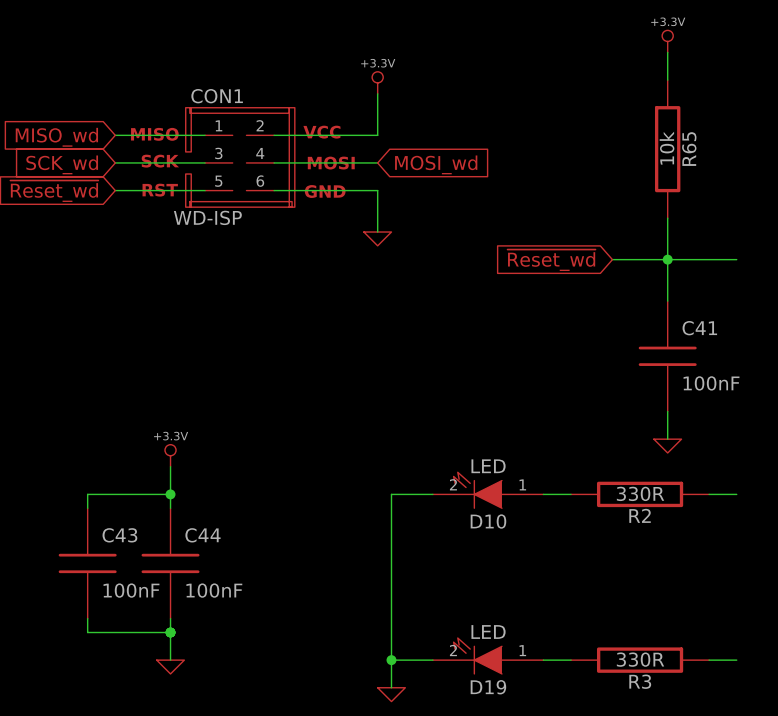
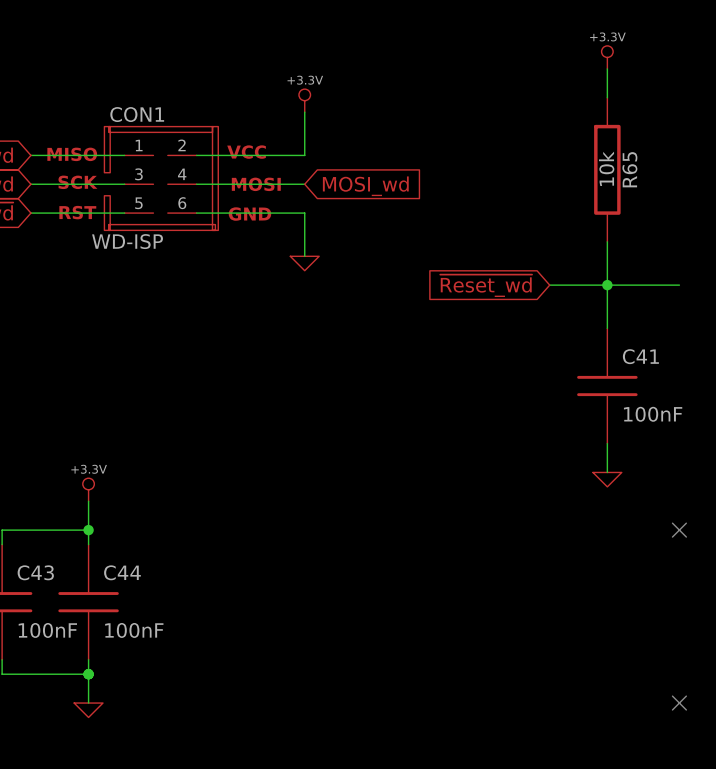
D10: LED (488, 490) -> none
wire: (432, 494) (391, 494) (391, 687) -> none
wire: (543, 494) (571, 494) -> none
R2: 330R (640, 494) -> none
wire: (709, 494) (736, 494) -> none
no-connect mark: none -> (679, 530)
D19: LED (488, 655) -> none
wire: (391, 660) (432, 660) -> none
junction: (391, 660) -> none
wire: (543, 660) (571, 660) -> none
R3: 330R (640, 660) -> none
wire: (709, 660) (736, 660) -> none
no-connect mark: none -> (679, 703)
power symbol: (391, 694) -> none

